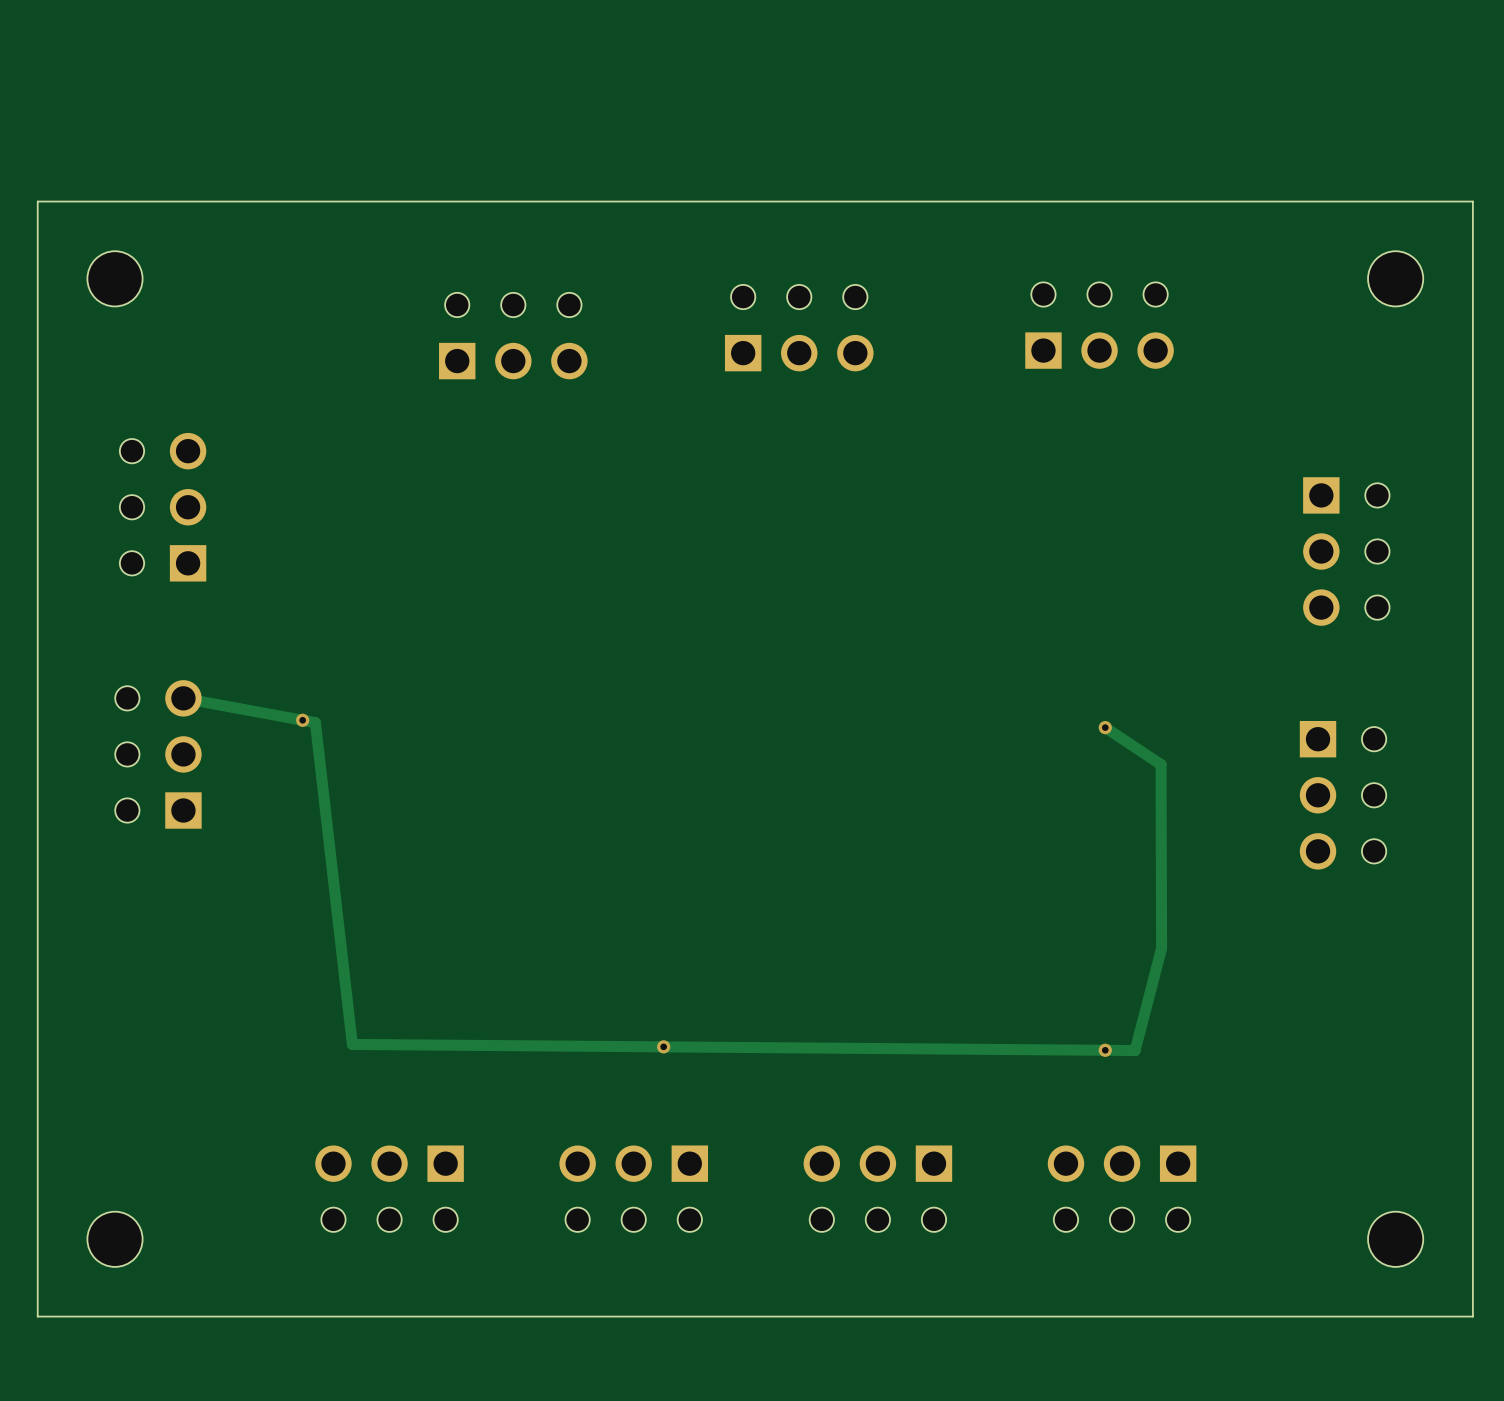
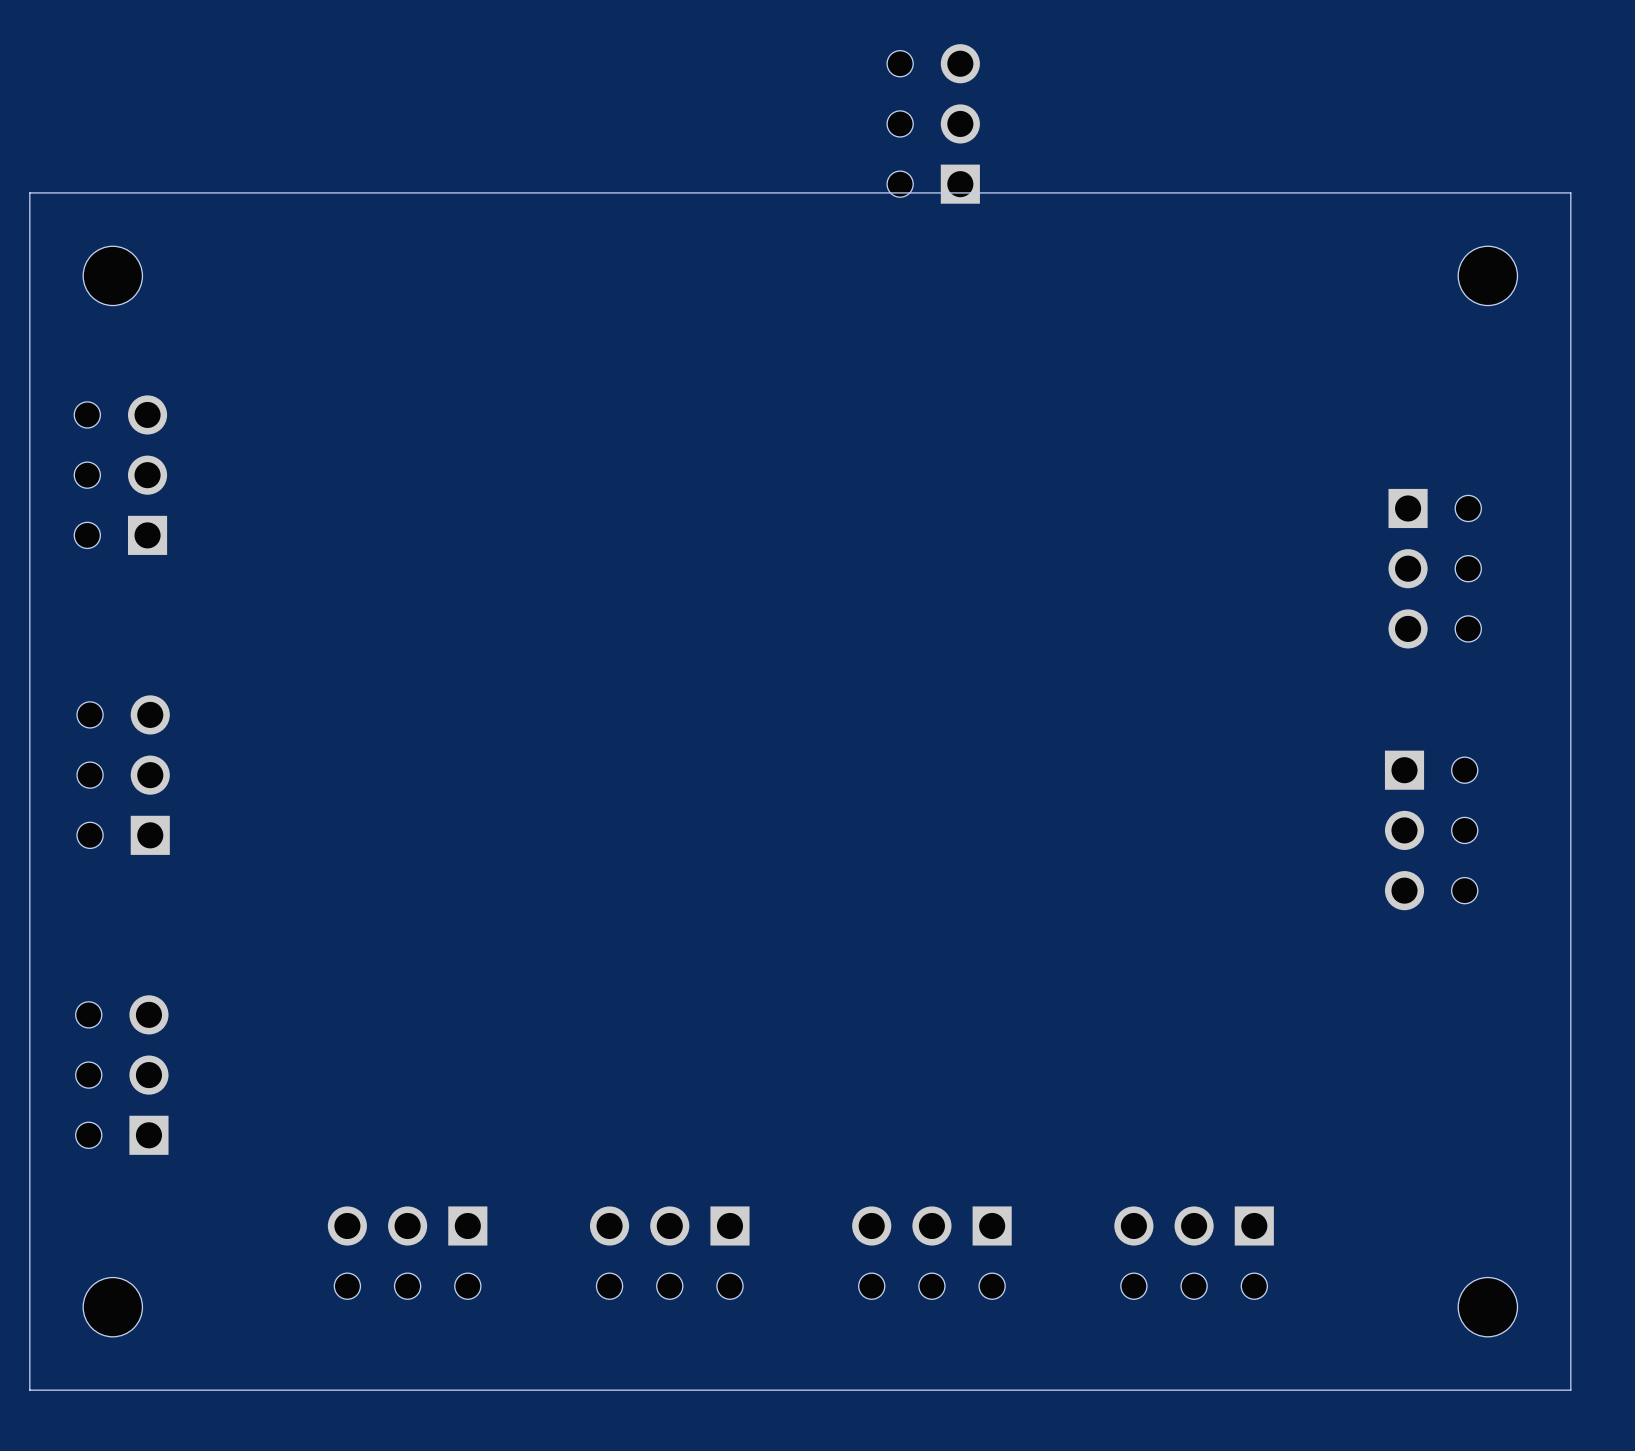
part: none -> (933, 123)
part: (1099, 325) -> none
part: (799, 328) -> none
part: (513, 336) -> none
part position: (163, 507) -> (120, 475)
track: (183, 698) (315, 722) (352, 1044) (1135, 1050) (1161, 948) (1161, 764) (1105, 727) -> none
via: (302, 720) -> none
via: (1105, 727) -> none
part position: (158, 754) -> (123, 775)
part: none -> (122, 1075)
via: (663, 1046) -> none
via: (1105, 1050) -> none

